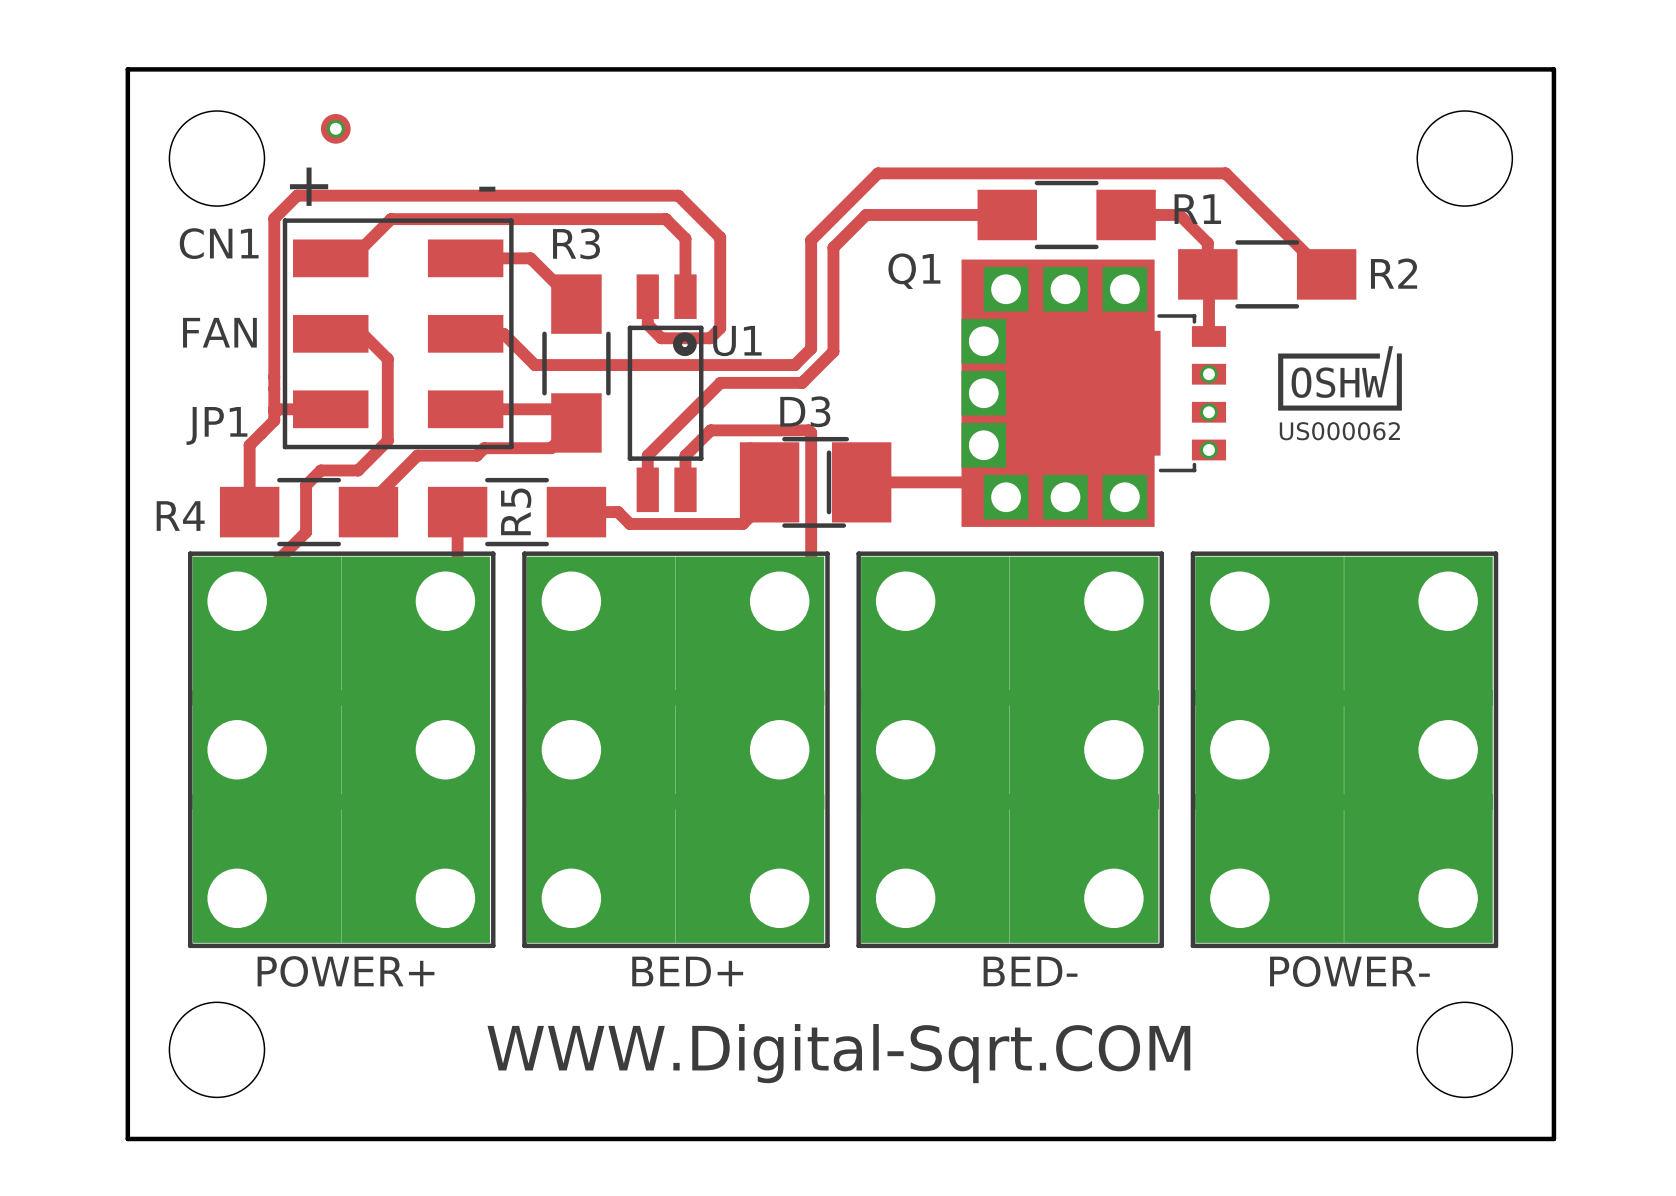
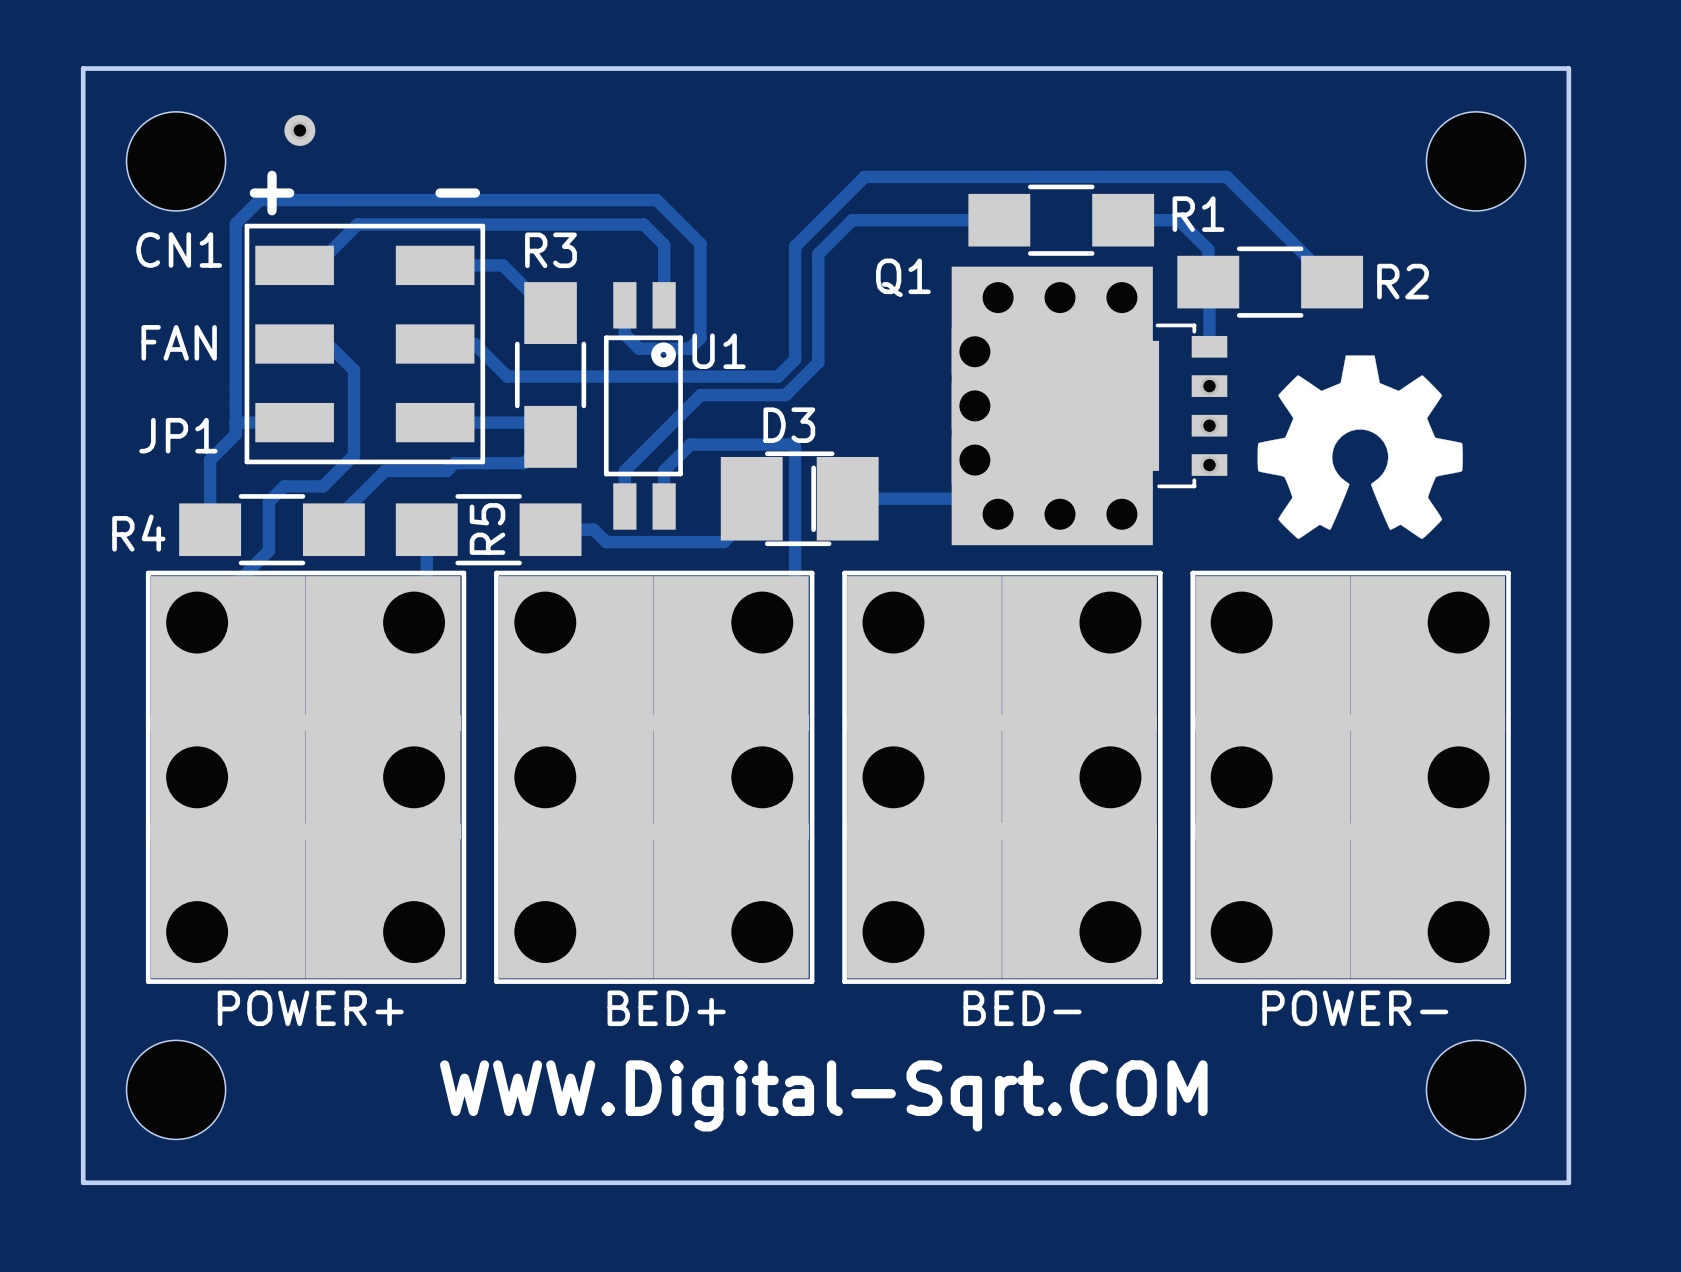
drawing: none -> [1257, 355, 1463, 540]
drawing: [1278, 346, 1402, 411] -> none

